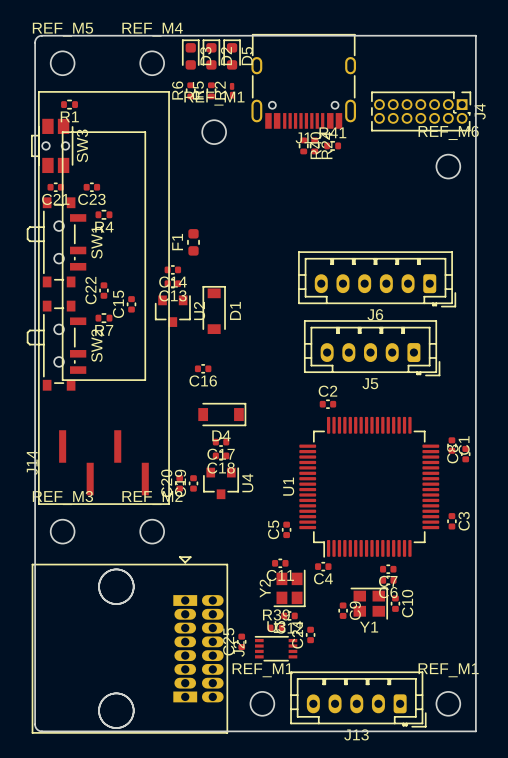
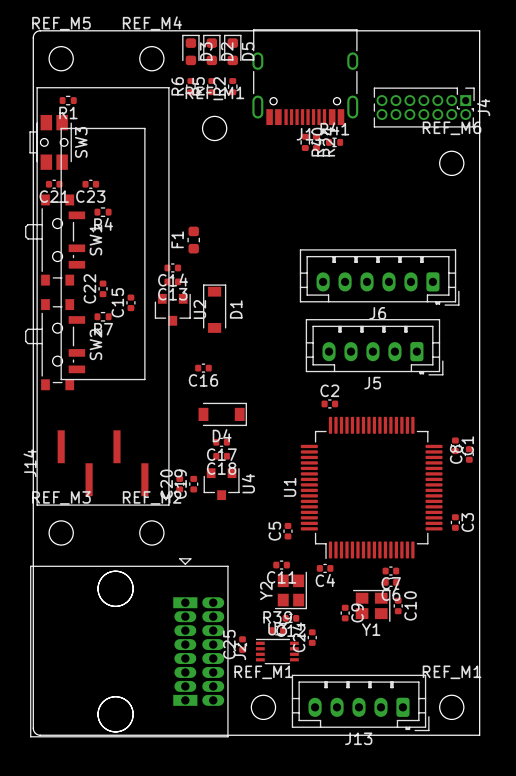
R2 footprint: [229, 82, 235, 99] -> [227, 78, 238, 96]

